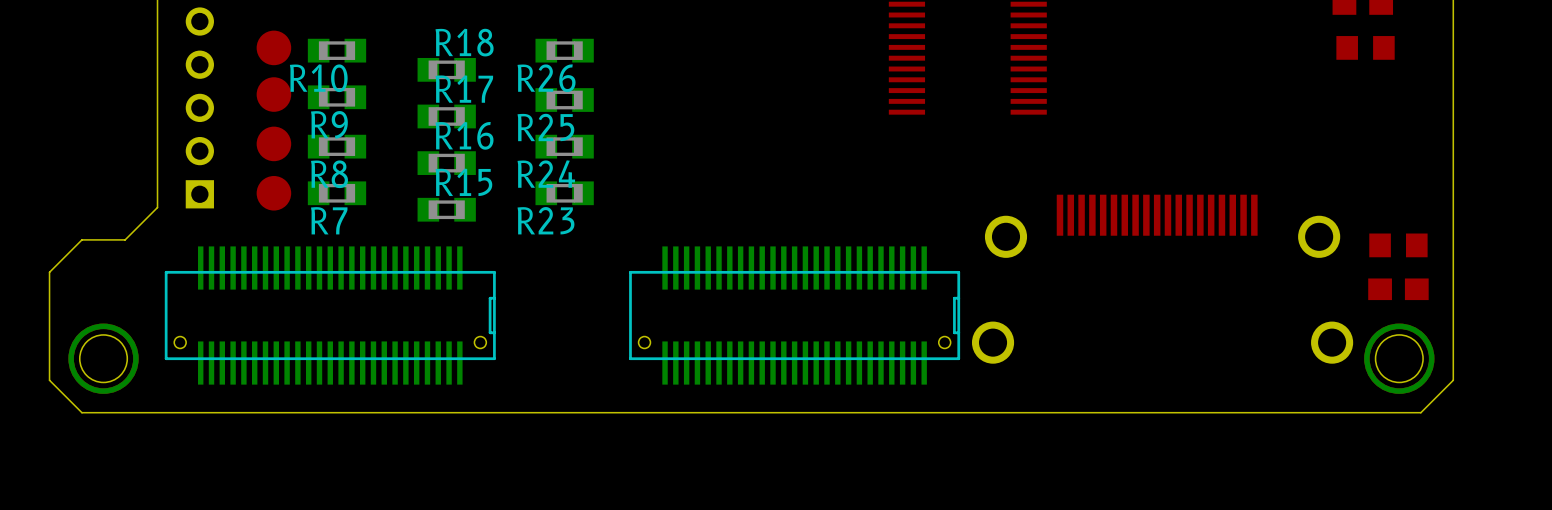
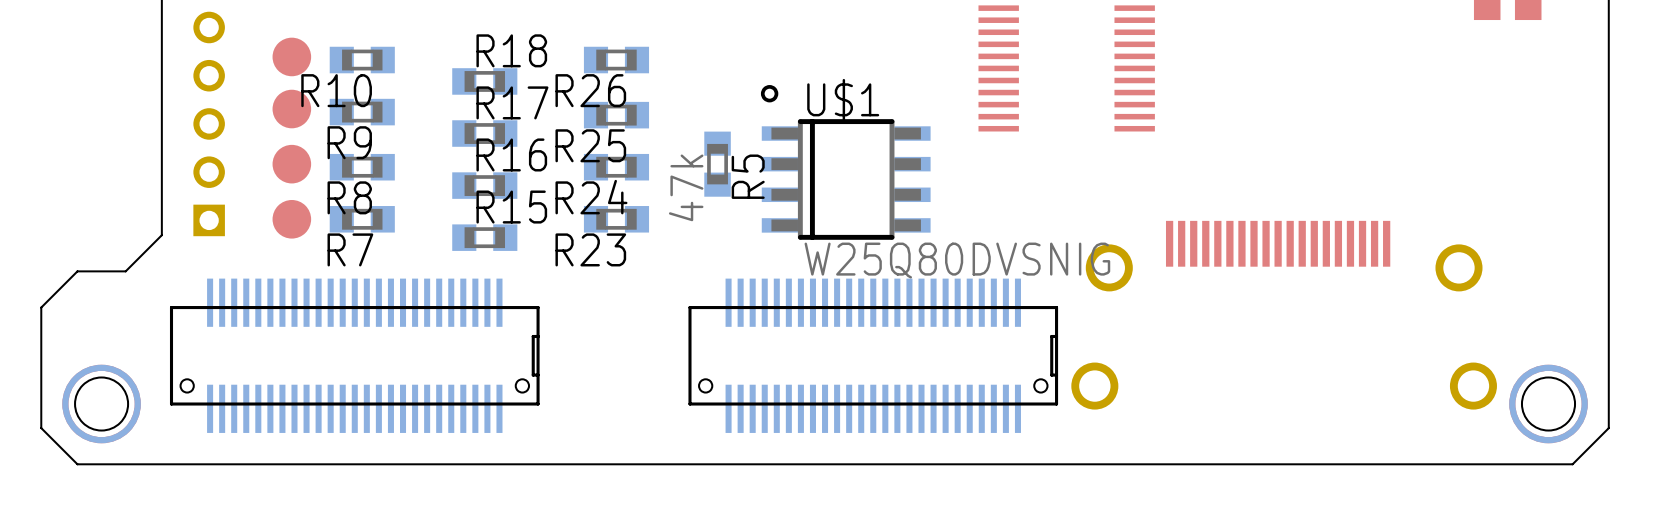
part: (1365, 47) -> none
U$1: none -> W25Q80DVSNIG (845, 162)
R5: none -> 47k (717, 164)
part: (1398, 245) -> none
part: (1398, 289) -> none

